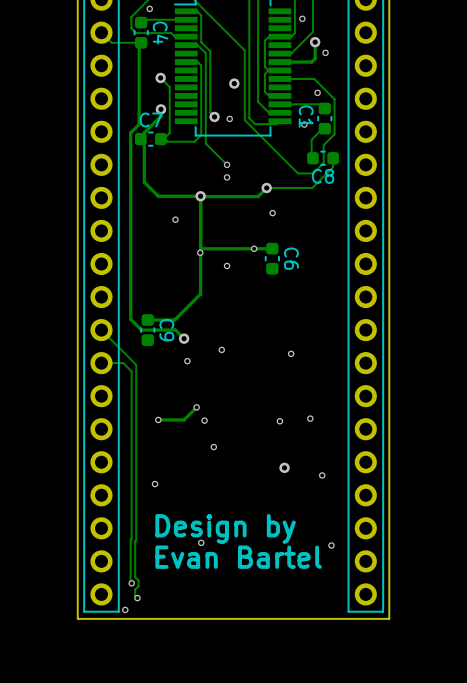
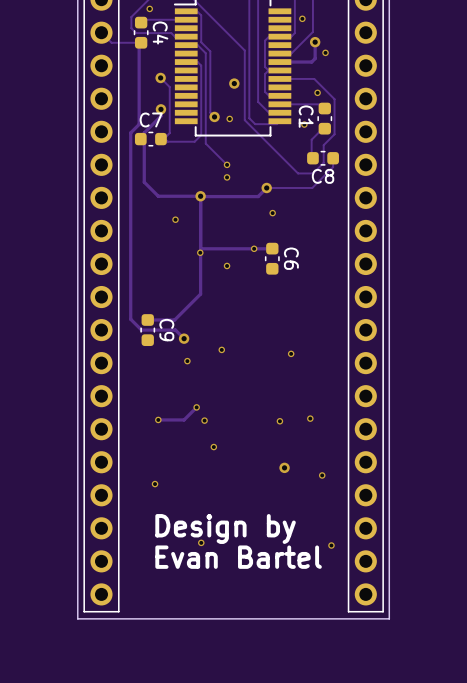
track: (101, 330) (136, 364) (135, 577) (138, 580) (138, 586) (135, 589) (135, 595) (137, 598) -> none
track: (101, 363) (123, 363) (131, 371) (131, 583) -> none
via: (131, 583) -> none
via: (137, 598) -> none
via: (125, 609) -> none

